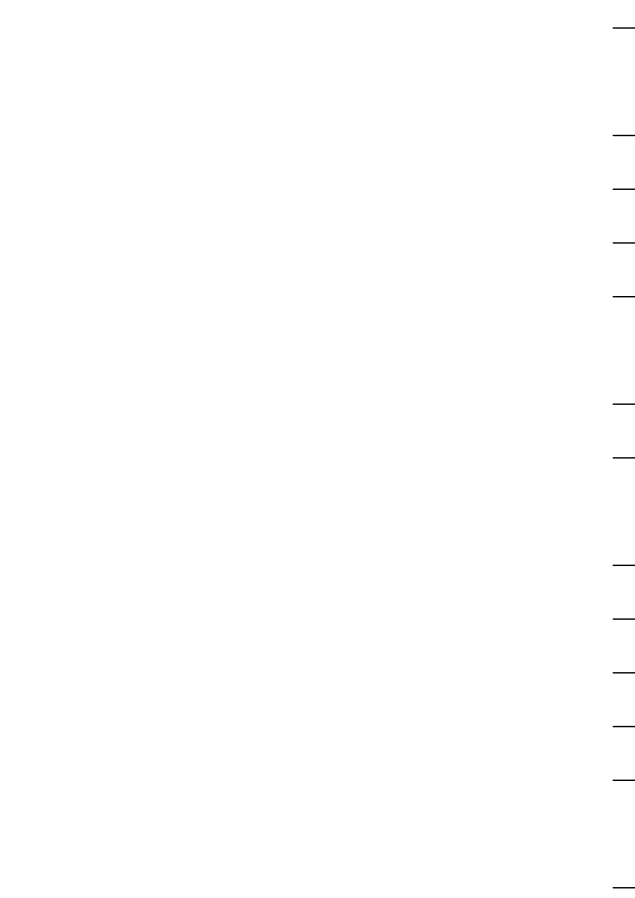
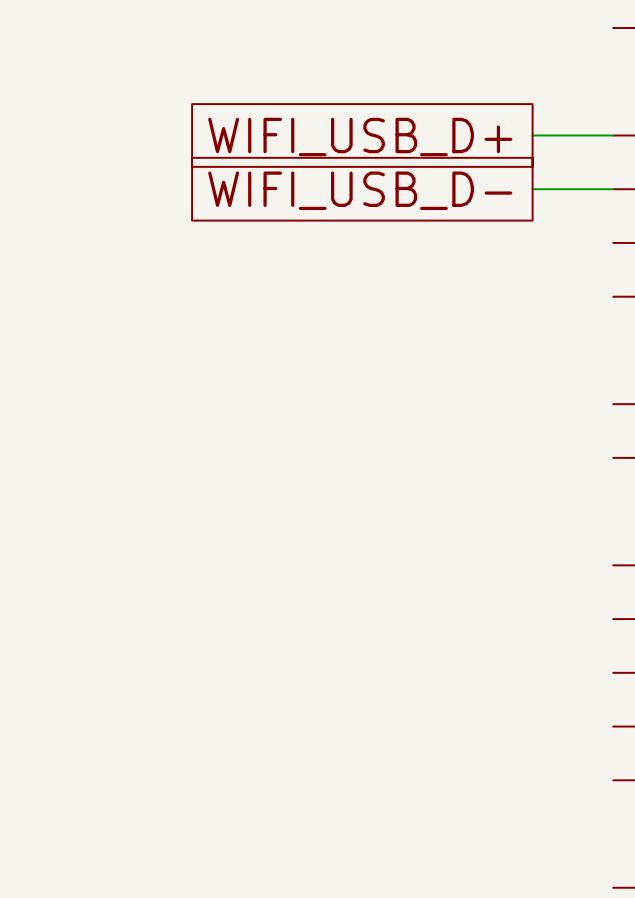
wire: none -> (532, 135) (613, 135)
global label: none -> WIFI_USB_D+ (360, 137)
wire: none -> (532, 189) (613, 189)
global label: none -> WIFI_USB_D- (360, 190)

